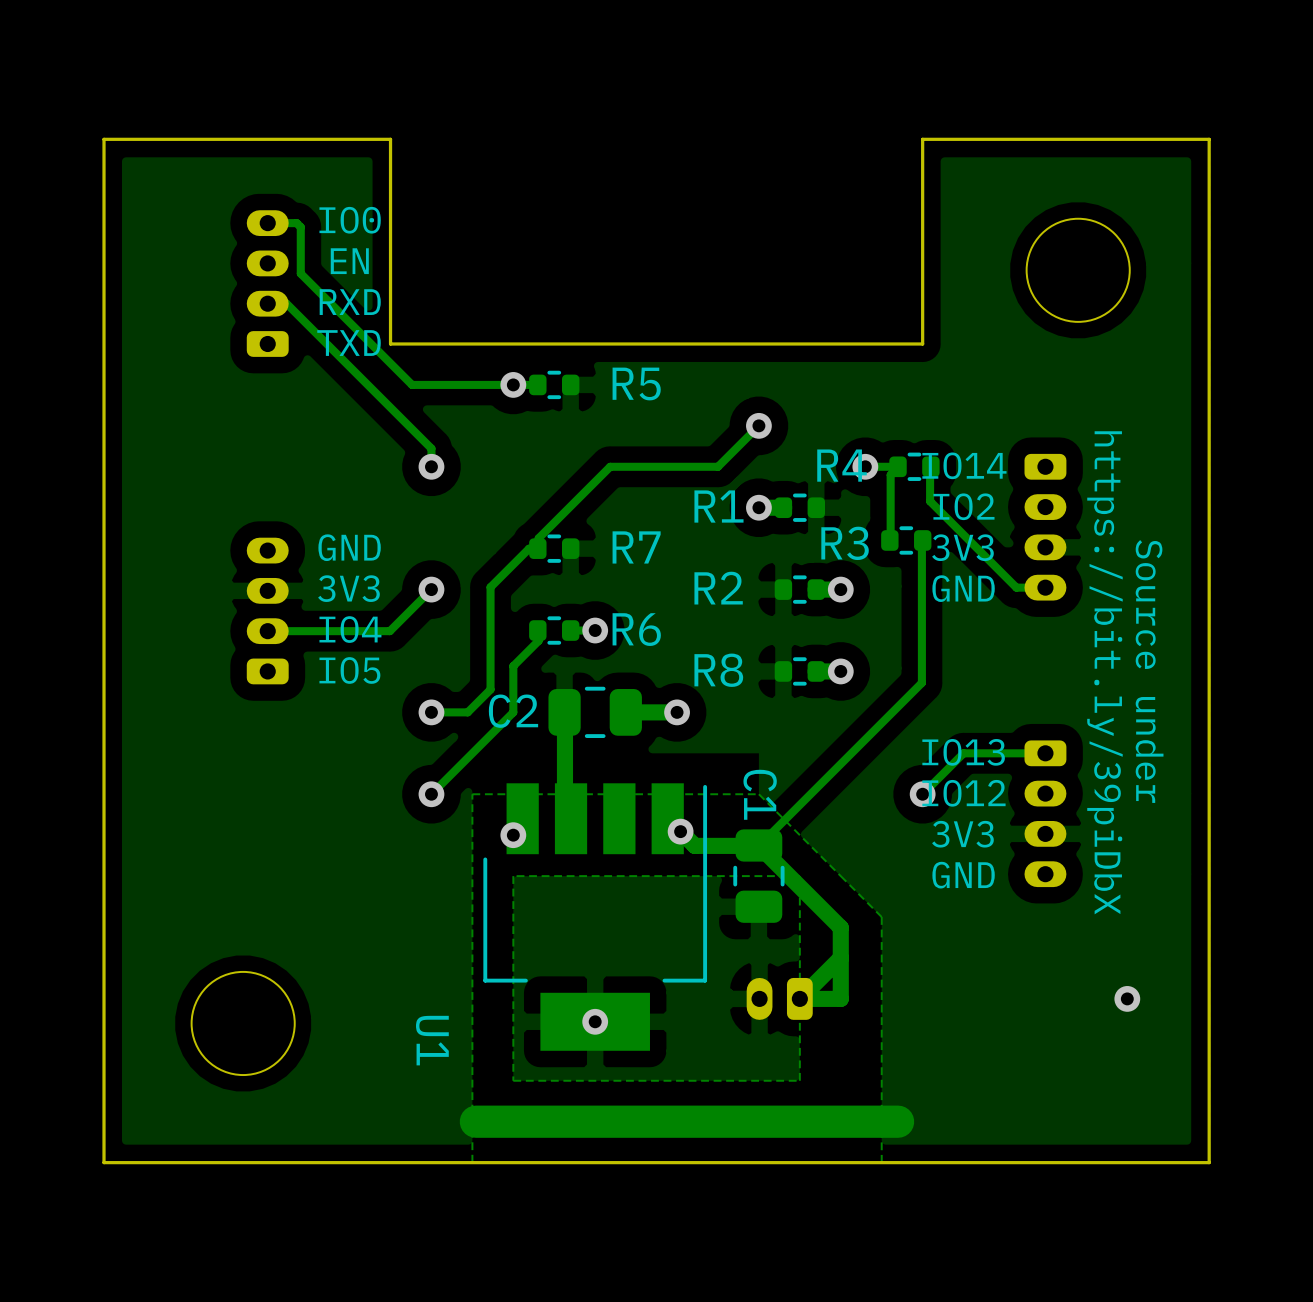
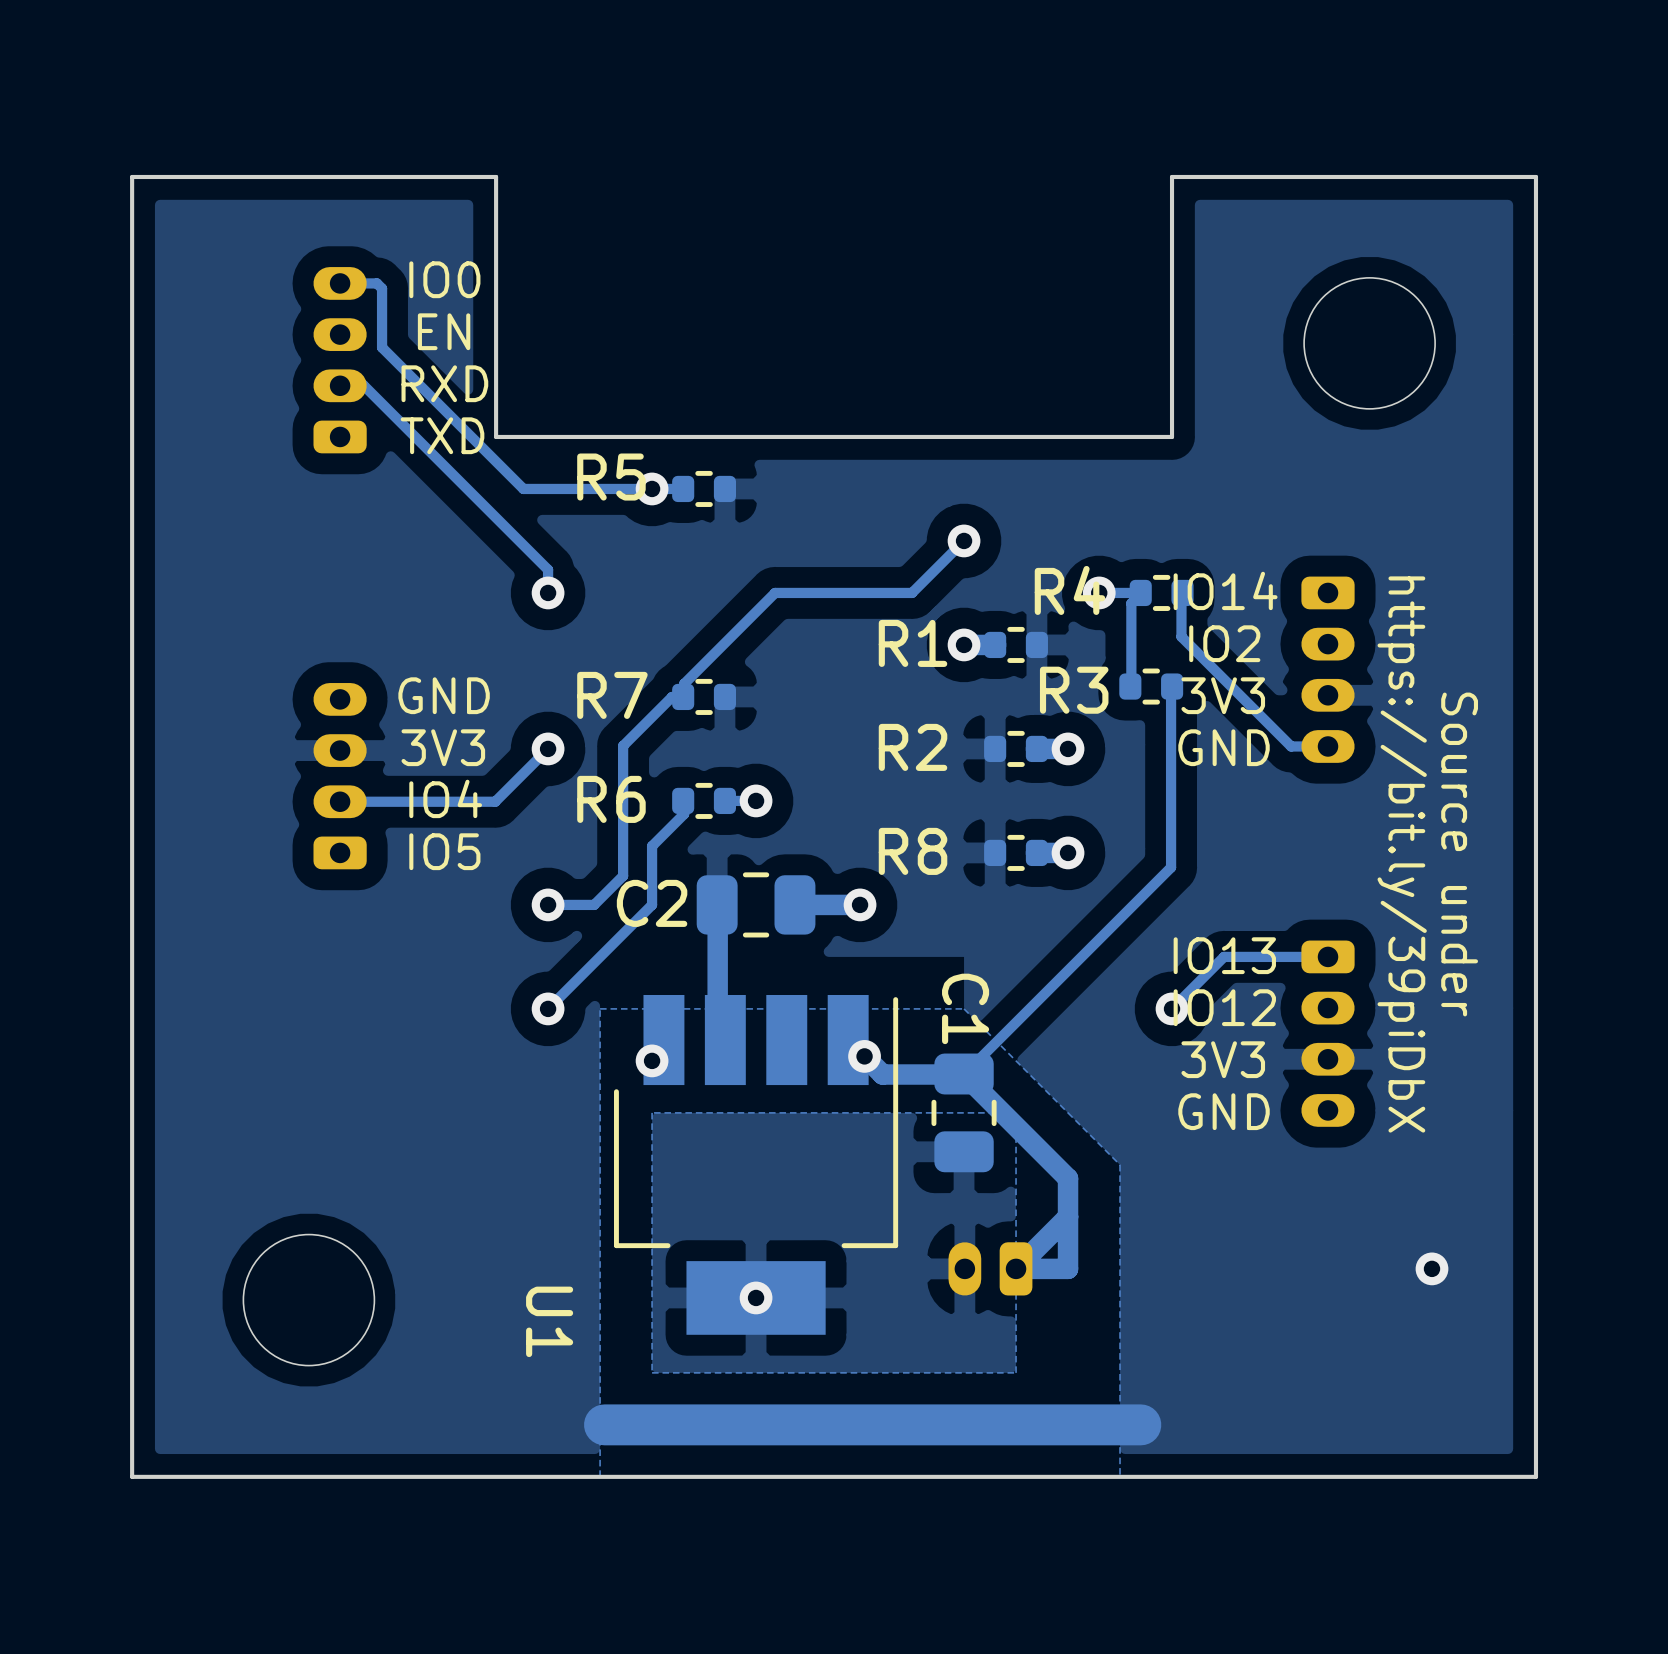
R5 name position: R5 (636, 384) -> R5 (611, 477)
R7 name position: R7 (636, 547) -> R7 (612, 695)
R6 name position: R6 (636, 629) -> R6 (611, 799)

